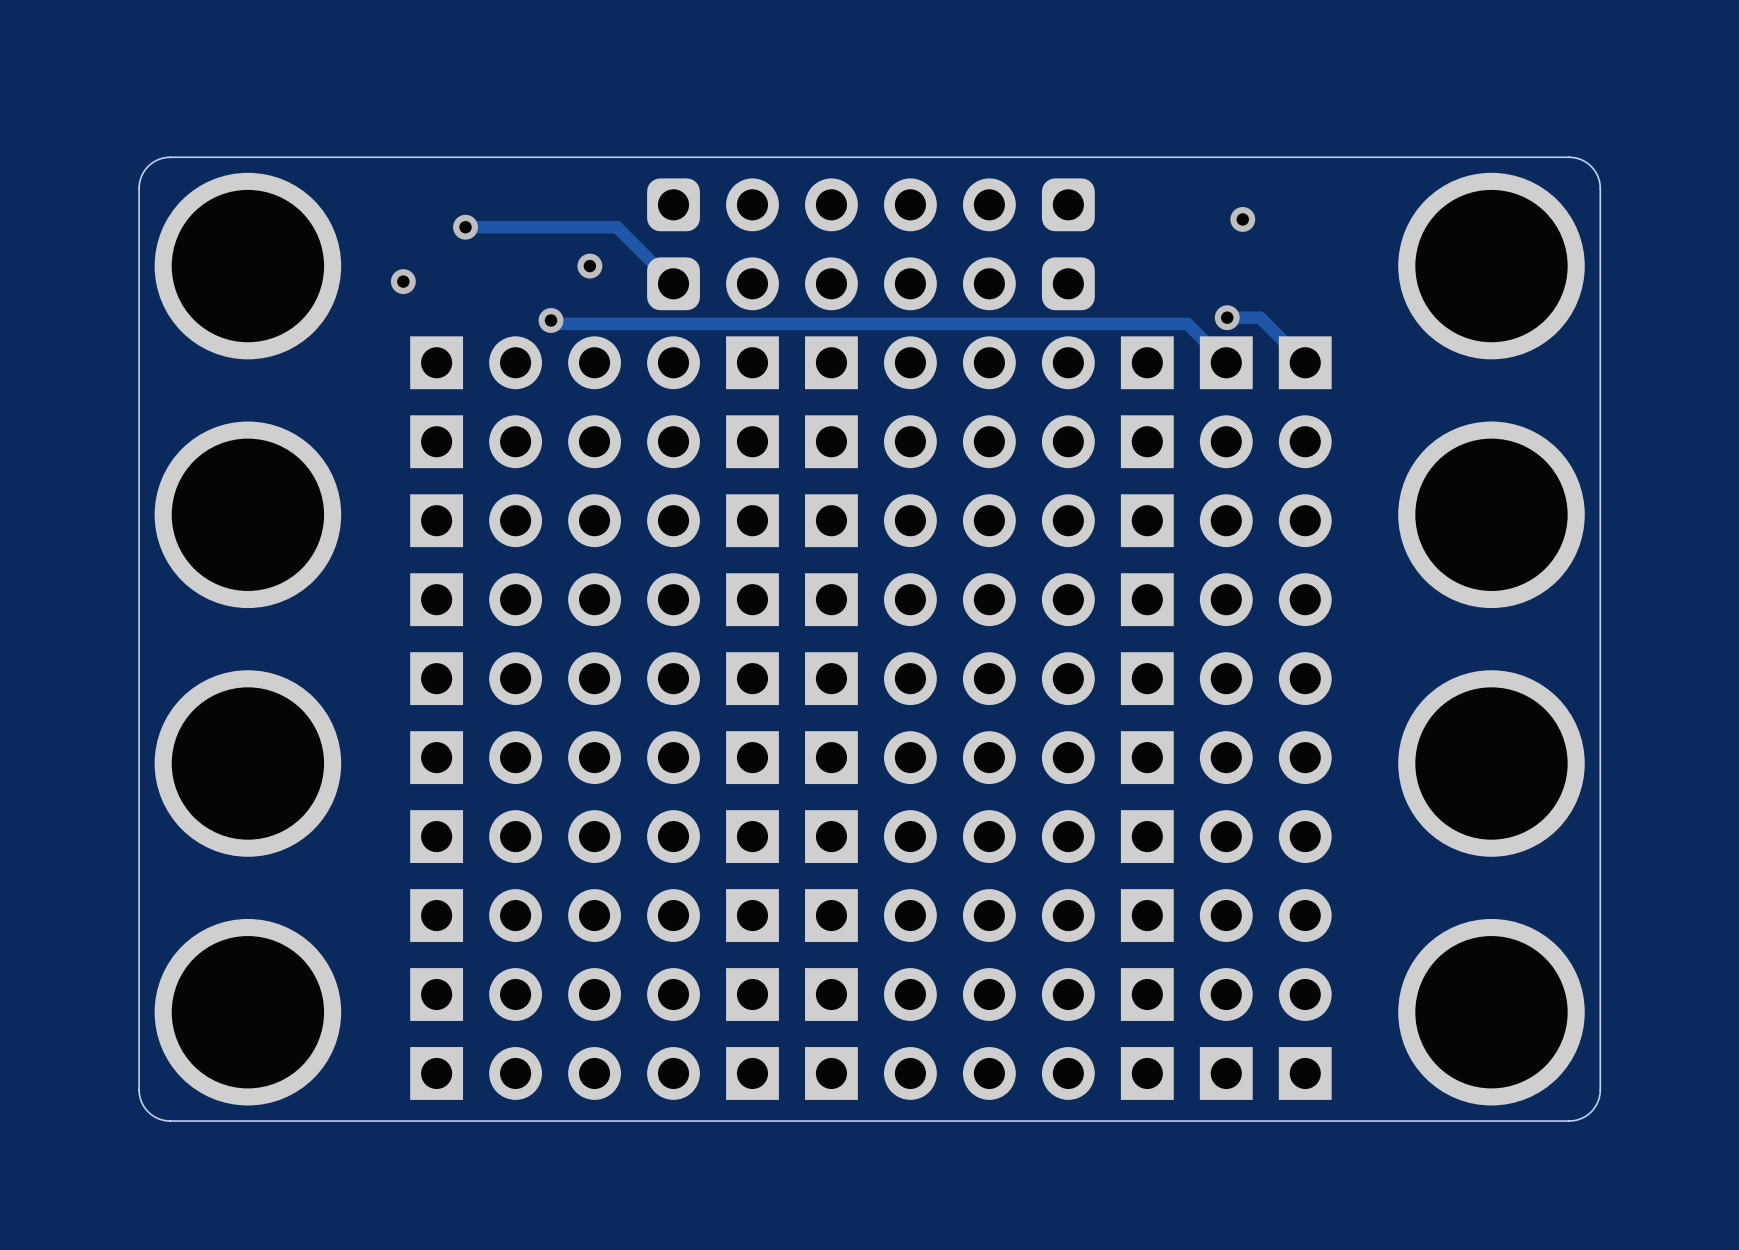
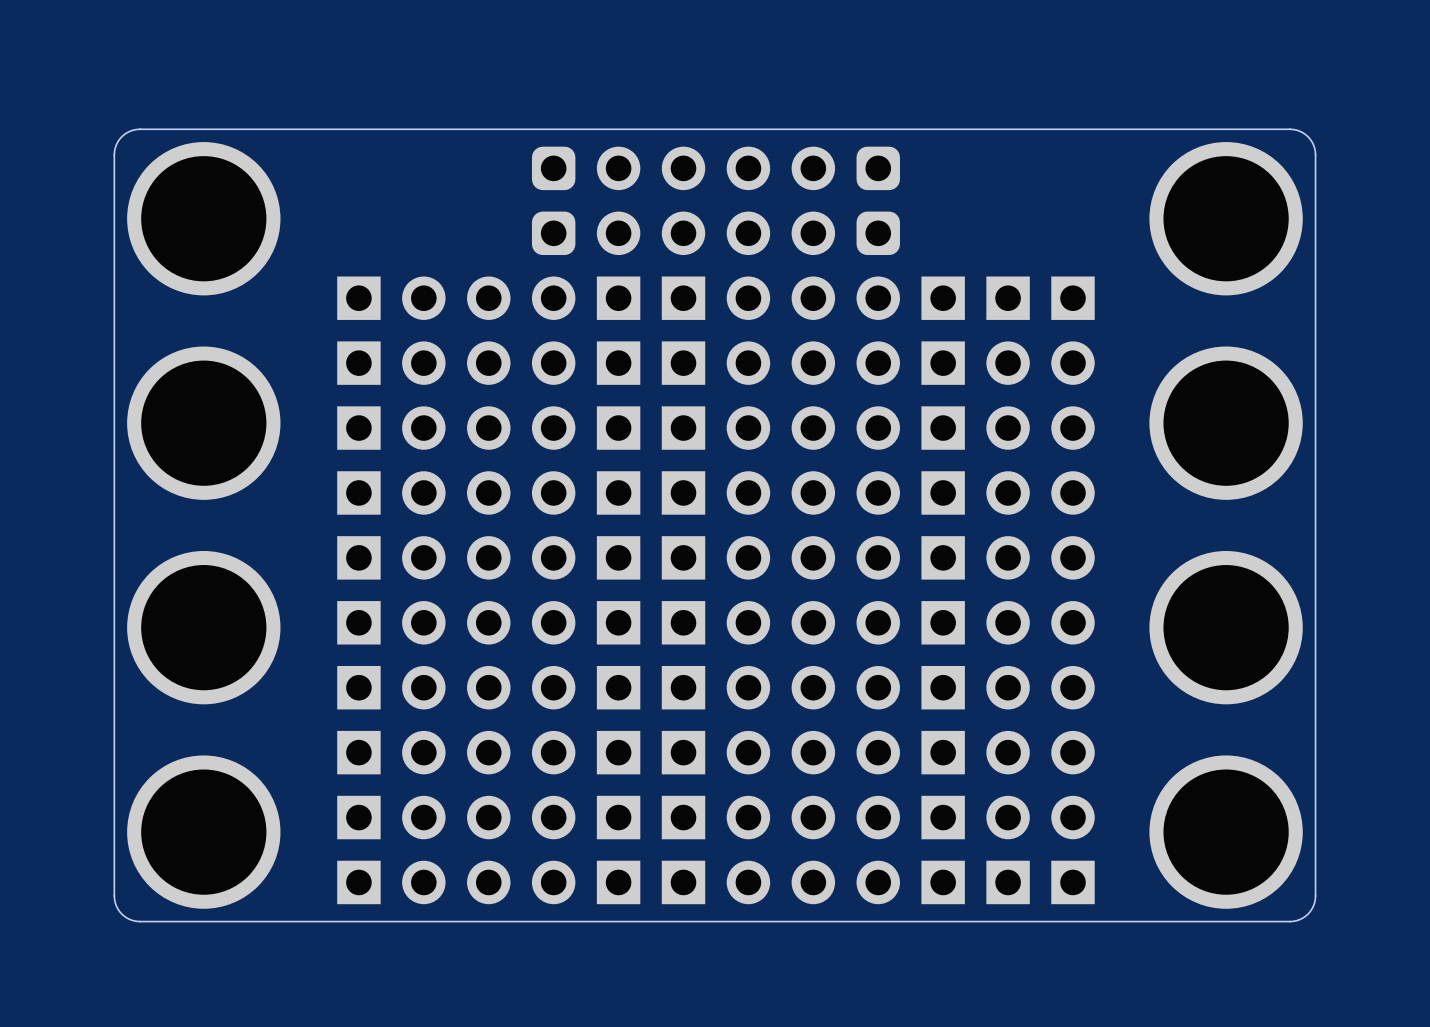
via: (1242, 219) -> none
track: (465, 227) (616, 227) (673, 283) -> none
via: (465, 227) -> none
via: (589, 266) -> none
via: (403, 281) -> none
track: (1227, 317) (1260, 317) (1305, 362) -> none
via: (1227, 317) -> none
track: (551, 320) (554, 323) (1187, 323) (1226, 362) -> none
via: (551, 320) -> none

